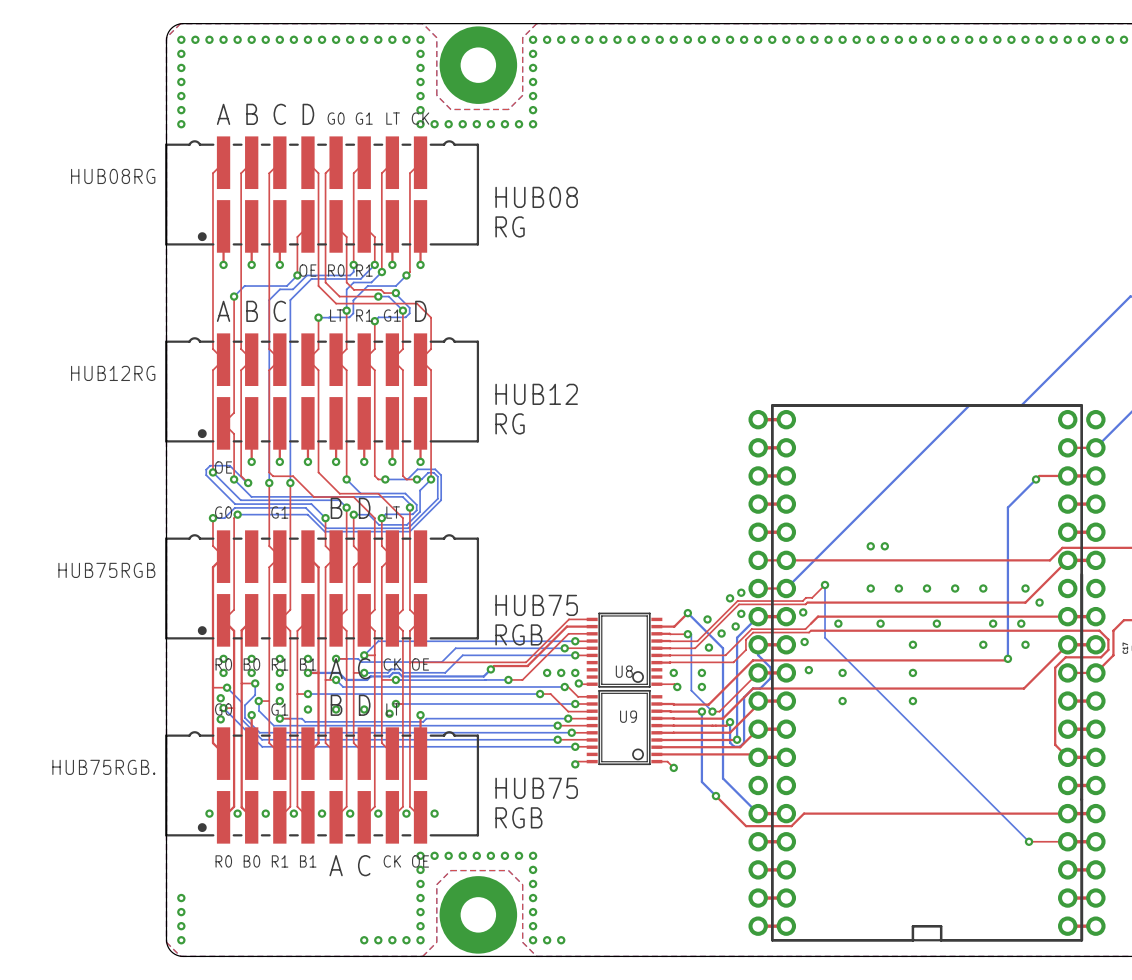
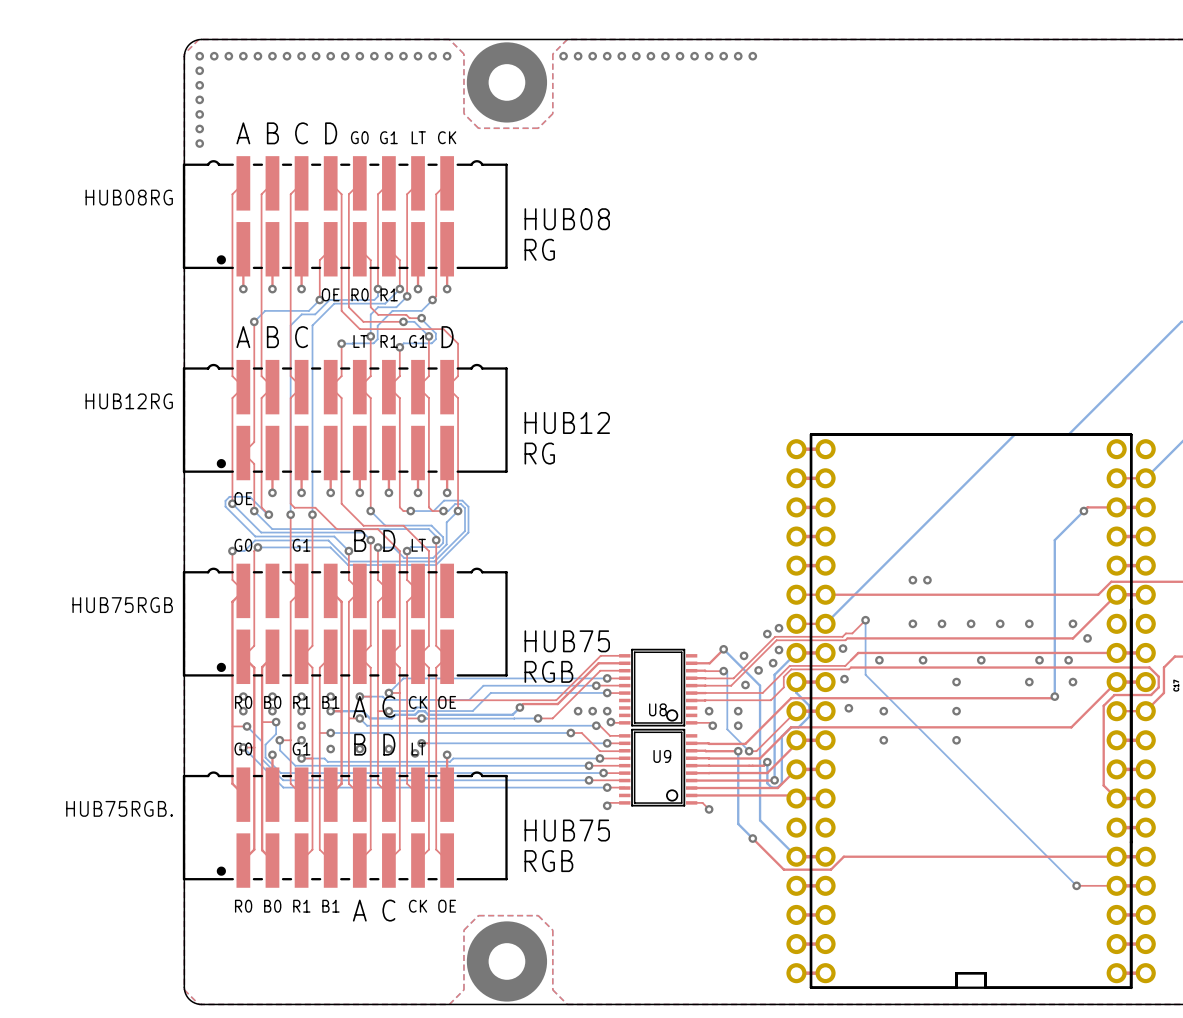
via: (730, 39) -> none
via: (744, 39) -> none
via: (758, 39) -> none
via: (772, 39) -> none
via: (786, 39) -> none
via: (800, 39) -> none
via: (814, 39) -> none
via: (828, 39) -> none
via: (842, 39) -> none
via: (856, 39) -> none
via: (870, 39) -> none
via: (884, 39) -> none
via: (898, 39) -> none
via: (912, 39) -> none
via: (927, 39) -> none
via: (941, 39) -> none
via: (955, 39) -> none
via: (969, 39) -> none
via: (983, 39) -> none
via: (997, 39) -> none
via: (1011, 39) -> none
via: (1025, 39) -> none
via: (1039, 39) -> none
via: (1053, 39) -> none
via: (1067, 39) -> none
via: (1081, 39) -> none
via: (1095, 39) -> none
via: (1109, 39) -> none
via: (1123, 39) -> none
via: (420, 53) -> none
via: (533, 53) -> none
via: (420, 67) -> none
via: (533, 67) -> none
via: (420, 82) -> none
via: (533, 82) -> none
via: (420, 96) -> none
via: (533, 96) -> none
via: (420, 110) -> none
via: (533, 110) -> none
via: (420, 124) -> none
via: (434, 124) -> none
via: (448, 124) -> none
via: (462, 124) -> none
via: (476, 124) -> none
via: (490, 124) -> none
via: (504, 124) -> none
via: (519, 124) -> none
via: (533, 124) -> none
via: (220, 698) -> none
via: (220, 719) -> none
via: (209, 813) -> none
via: (237, 813) -> none
via: (265, 813) -> none
via: (293, 813) -> none
via: (322, 813) -> none
via: (350, 813) -> none
via: (378, 813) -> none
via: (406, 813) -> none
via: (434, 813) -> none
via: (420, 855) -> none
via: (434, 855) -> none
via: (448, 855) -> none
via: (462, 855) -> none
via: (476, 855) -> none
via: (490, 855) -> none
via: (504, 855) -> none
via: (519, 855) -> none
via: (533, 855) -> none
via: (420, 869) -> none
via: (533, 869) -> none
via: (420, 883) -> none
via: (533, 883) -> none
via: (181, 898) -> none
via: (420, 898) -> none
via: (533, 898) -> none
via: (181, 912) -> none
via: (420, 912) -> none
via: (533, 912) -> none
via: (181, 926) -> none
via: (420, 926) -> none
via: (533, 926) -> none
via: (181, 940) -> none
via: (364, 940) -> none
via: (378, 940) -> none
via: (392, 940) -> none
via: (406, 940) -> none
via: (420, 940) -> none
via: (533, 940) -> none
via: (547, 940) -> none
via: (561, 940) -> none

